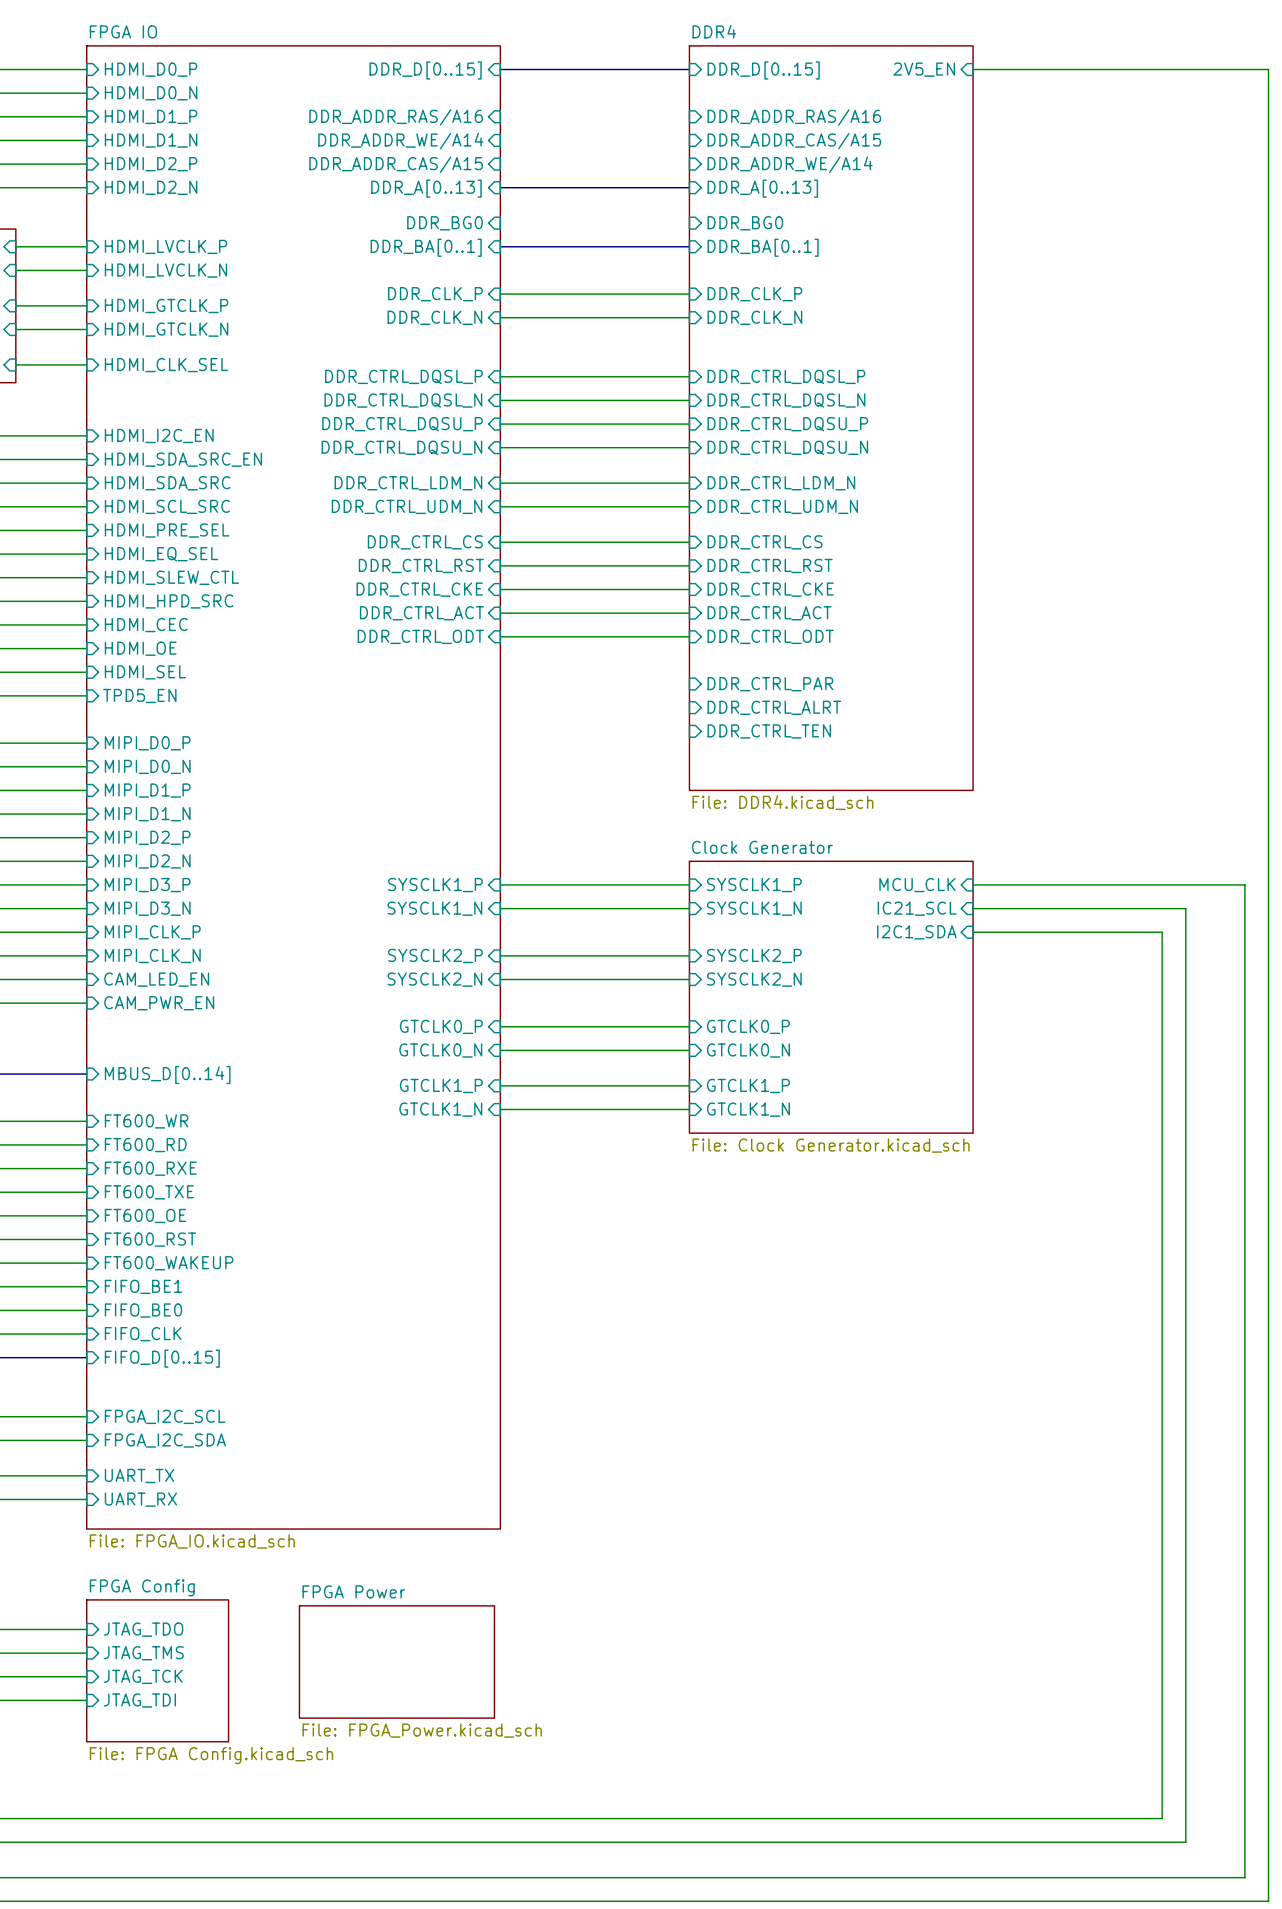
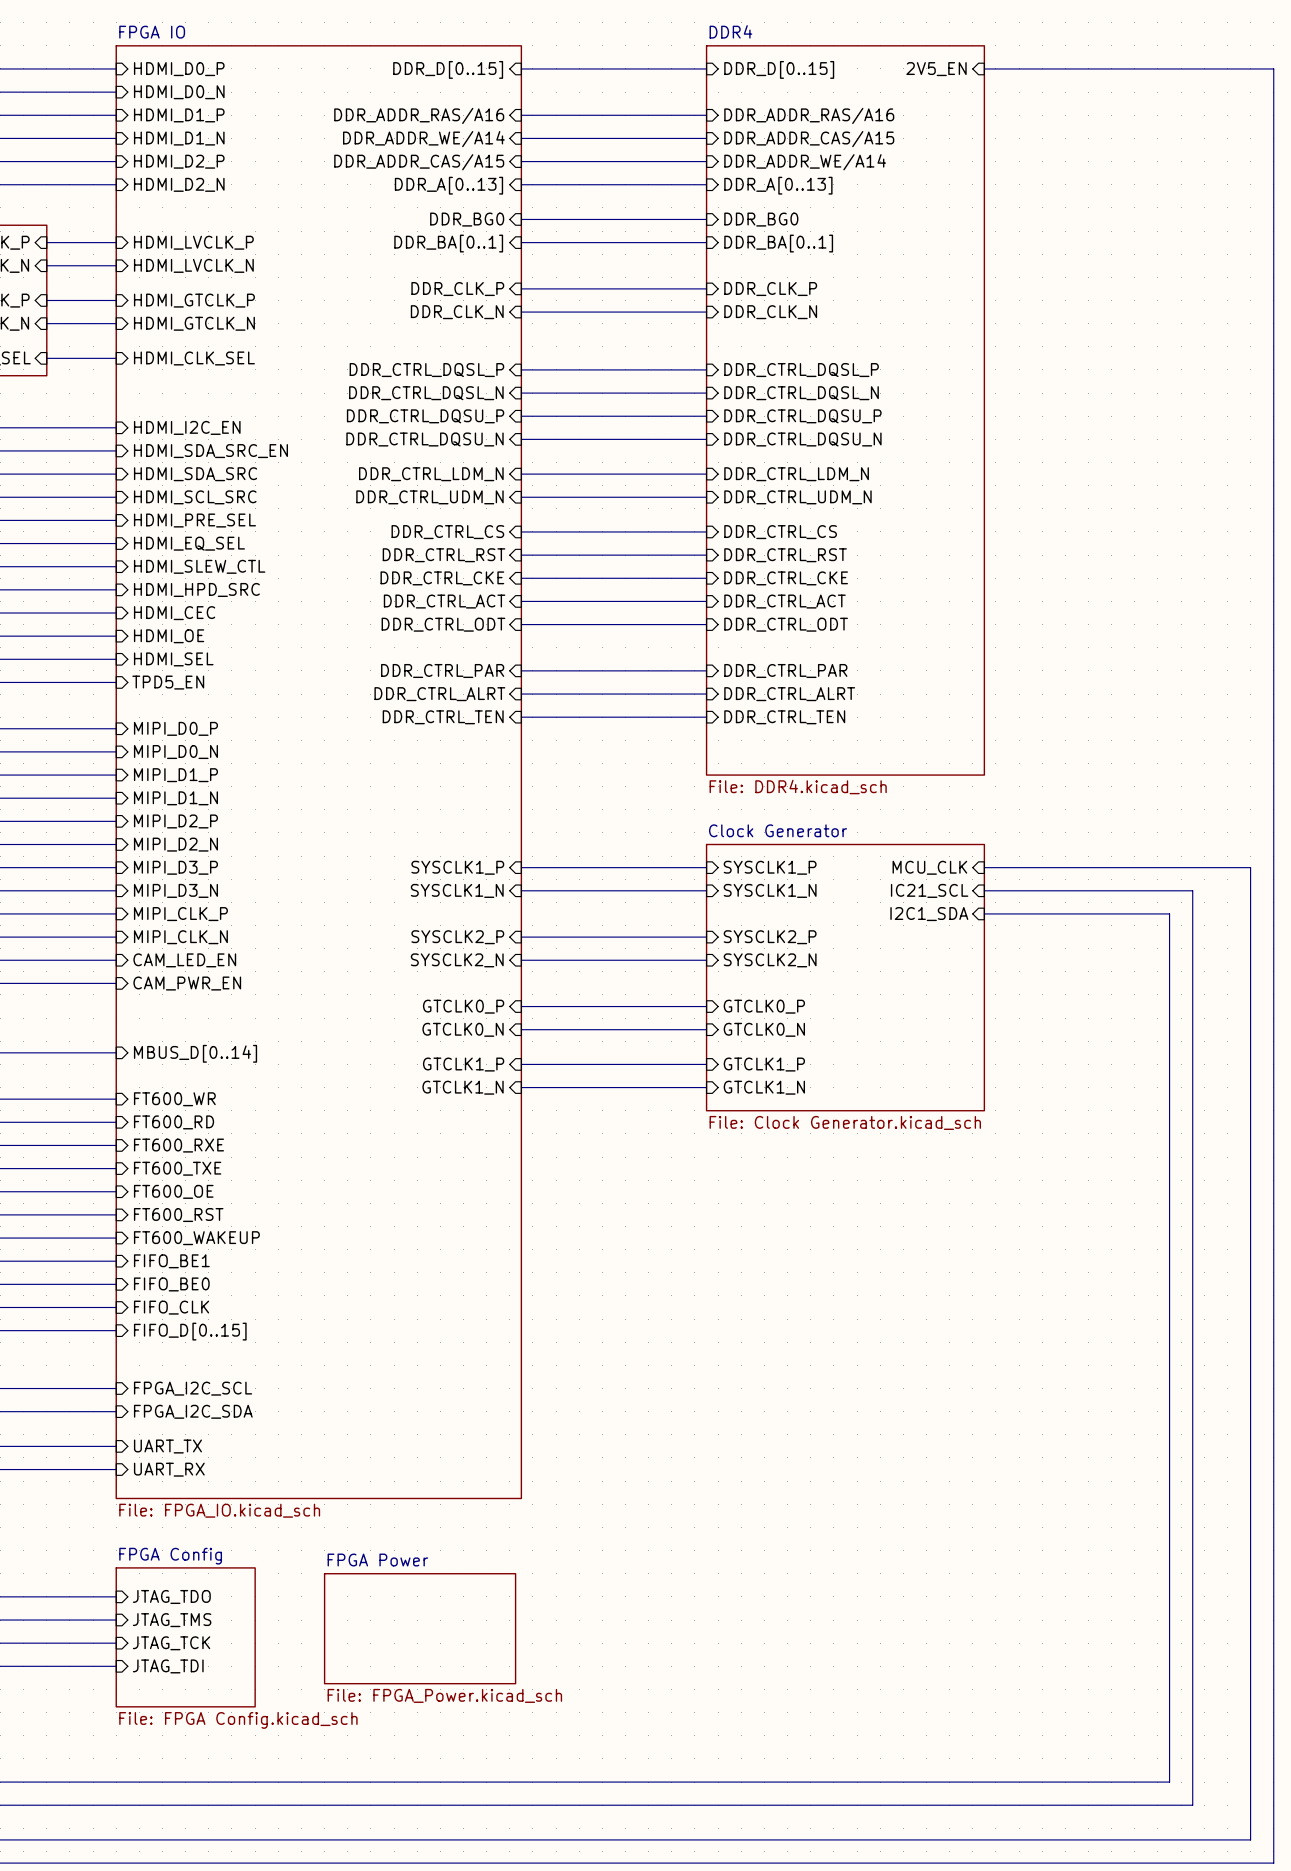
wire: none -> (521, 115) (706, 115)
wire: none -> (521, 138) (706, 138)
wire: none -> (521, 161) (706, 161)
wire: none -> (521, 219) (706, 219)
sheet pin: none -> DDR_CTRL_PAR (442, 670)
wire: none -> (521, 670) (706, 670)
sheet pin: none -> DDR_CTRL_ALRT (439, 694)
wire: none -> (521, 694) (706, 694)
sheet pin: none -> DDR_CTRL_TEN (443, 717)
wire: none -> (521, 717) (706, 717)

